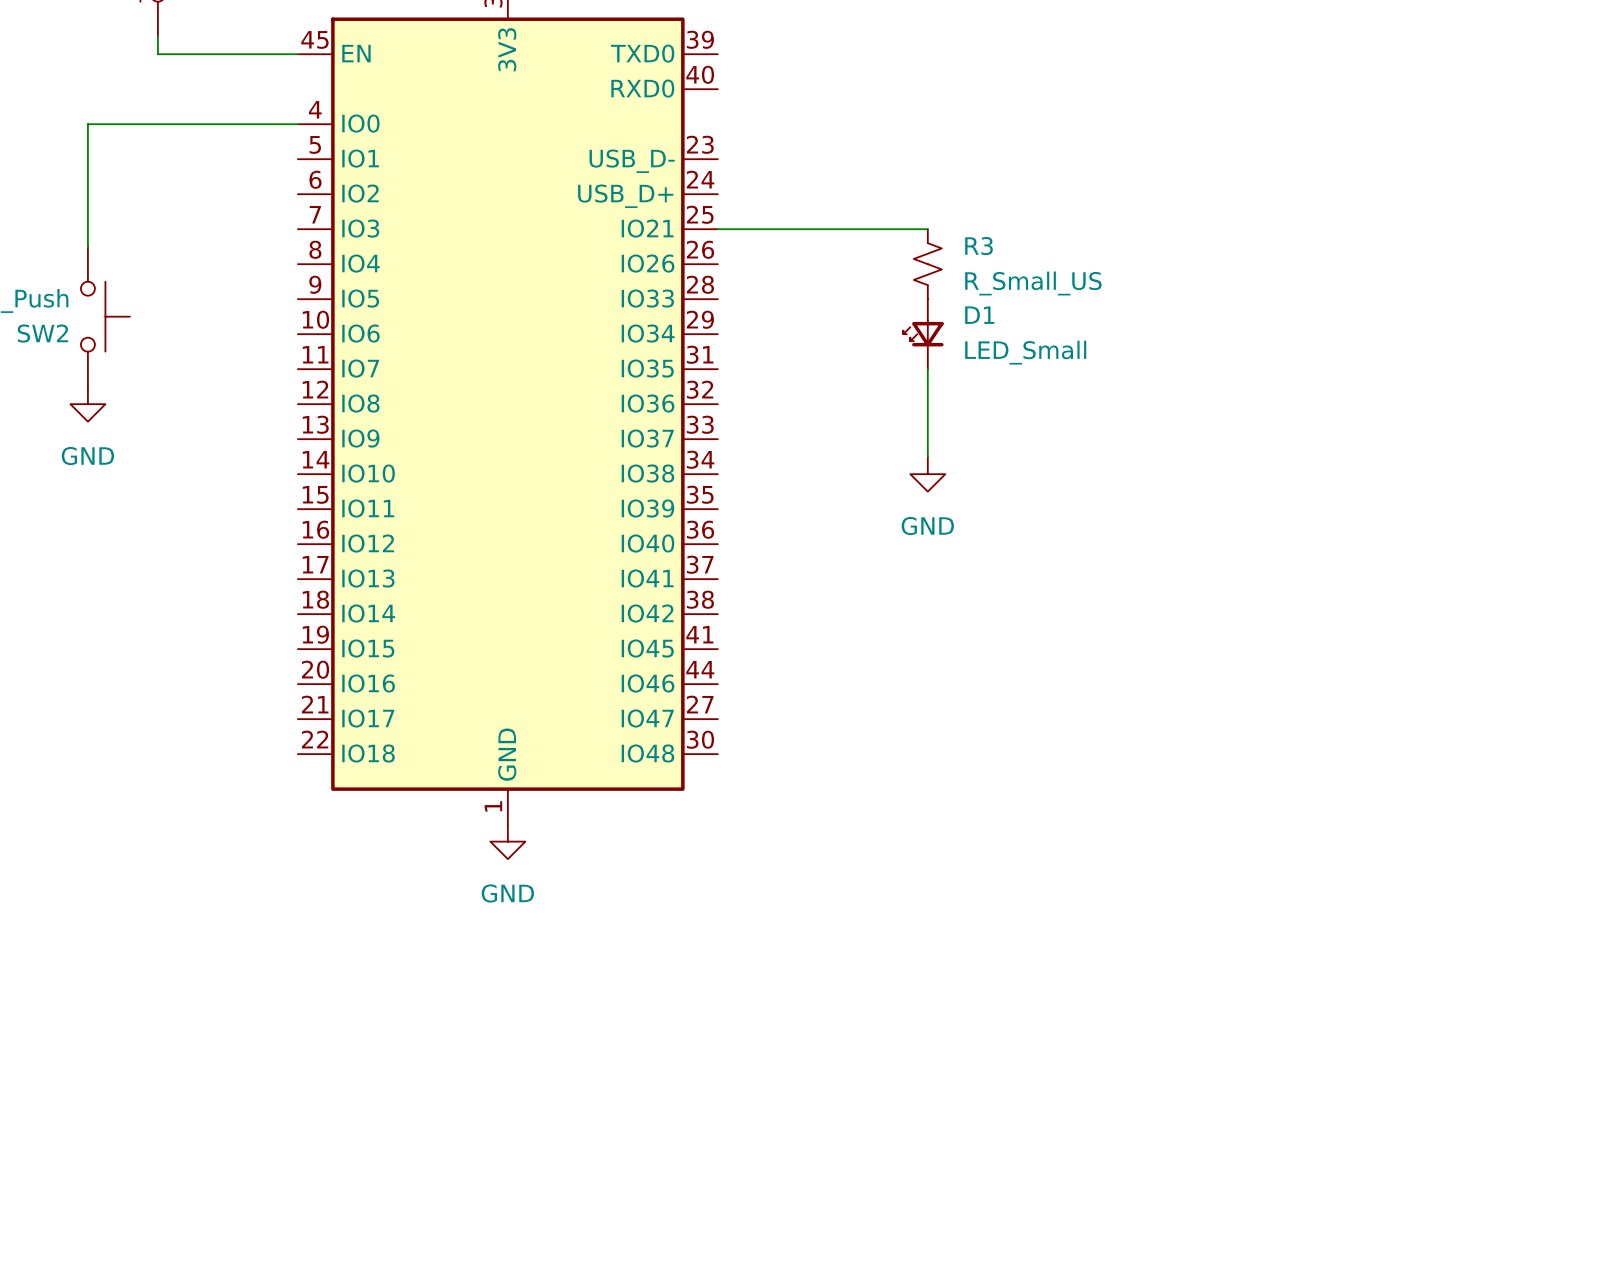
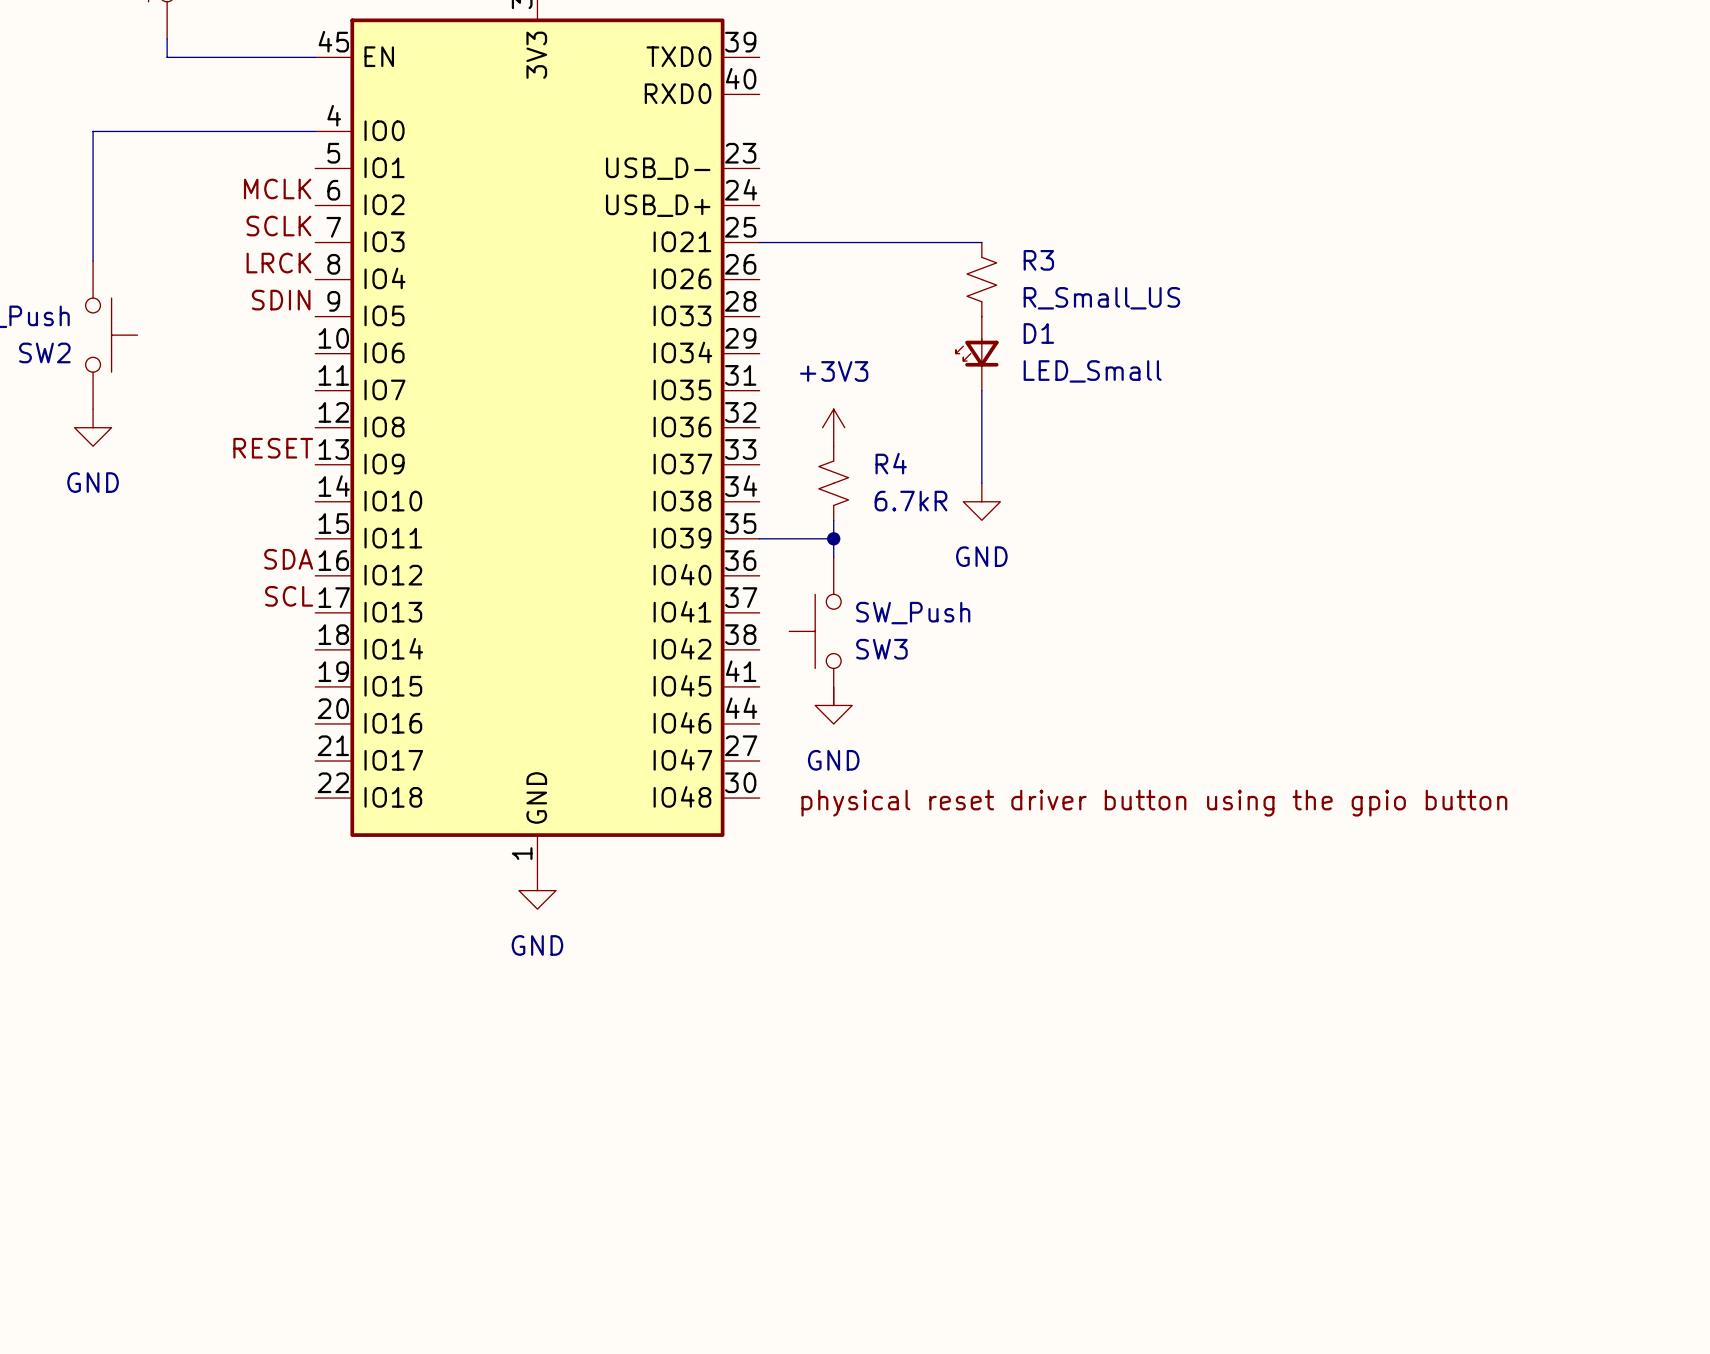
label: none -> MCLK (277, 188)
label: none -> SCLK (278, 226)
label: none -> LRCK (278, 263)
label: none -> SDIN (281, 300)
power symbol: none -> +3V3 (833, 427)
label: none -> RESET (273, 448)
R4: none -> 6.7kR (833, 483)
wire: none -> (833, 520) (833, 557)
wire: none -> (759, 538) (833, 538)
junction: none -> (833, 538)
label: none -> SDA (288, 559)
label: none -> SCL (289, 596)
SW3: none -> SW_Push (815, 631)
power symbol: none -> GND (833, 705)
label: none -> physical reset driver button using the gpio button (1154, 803)

